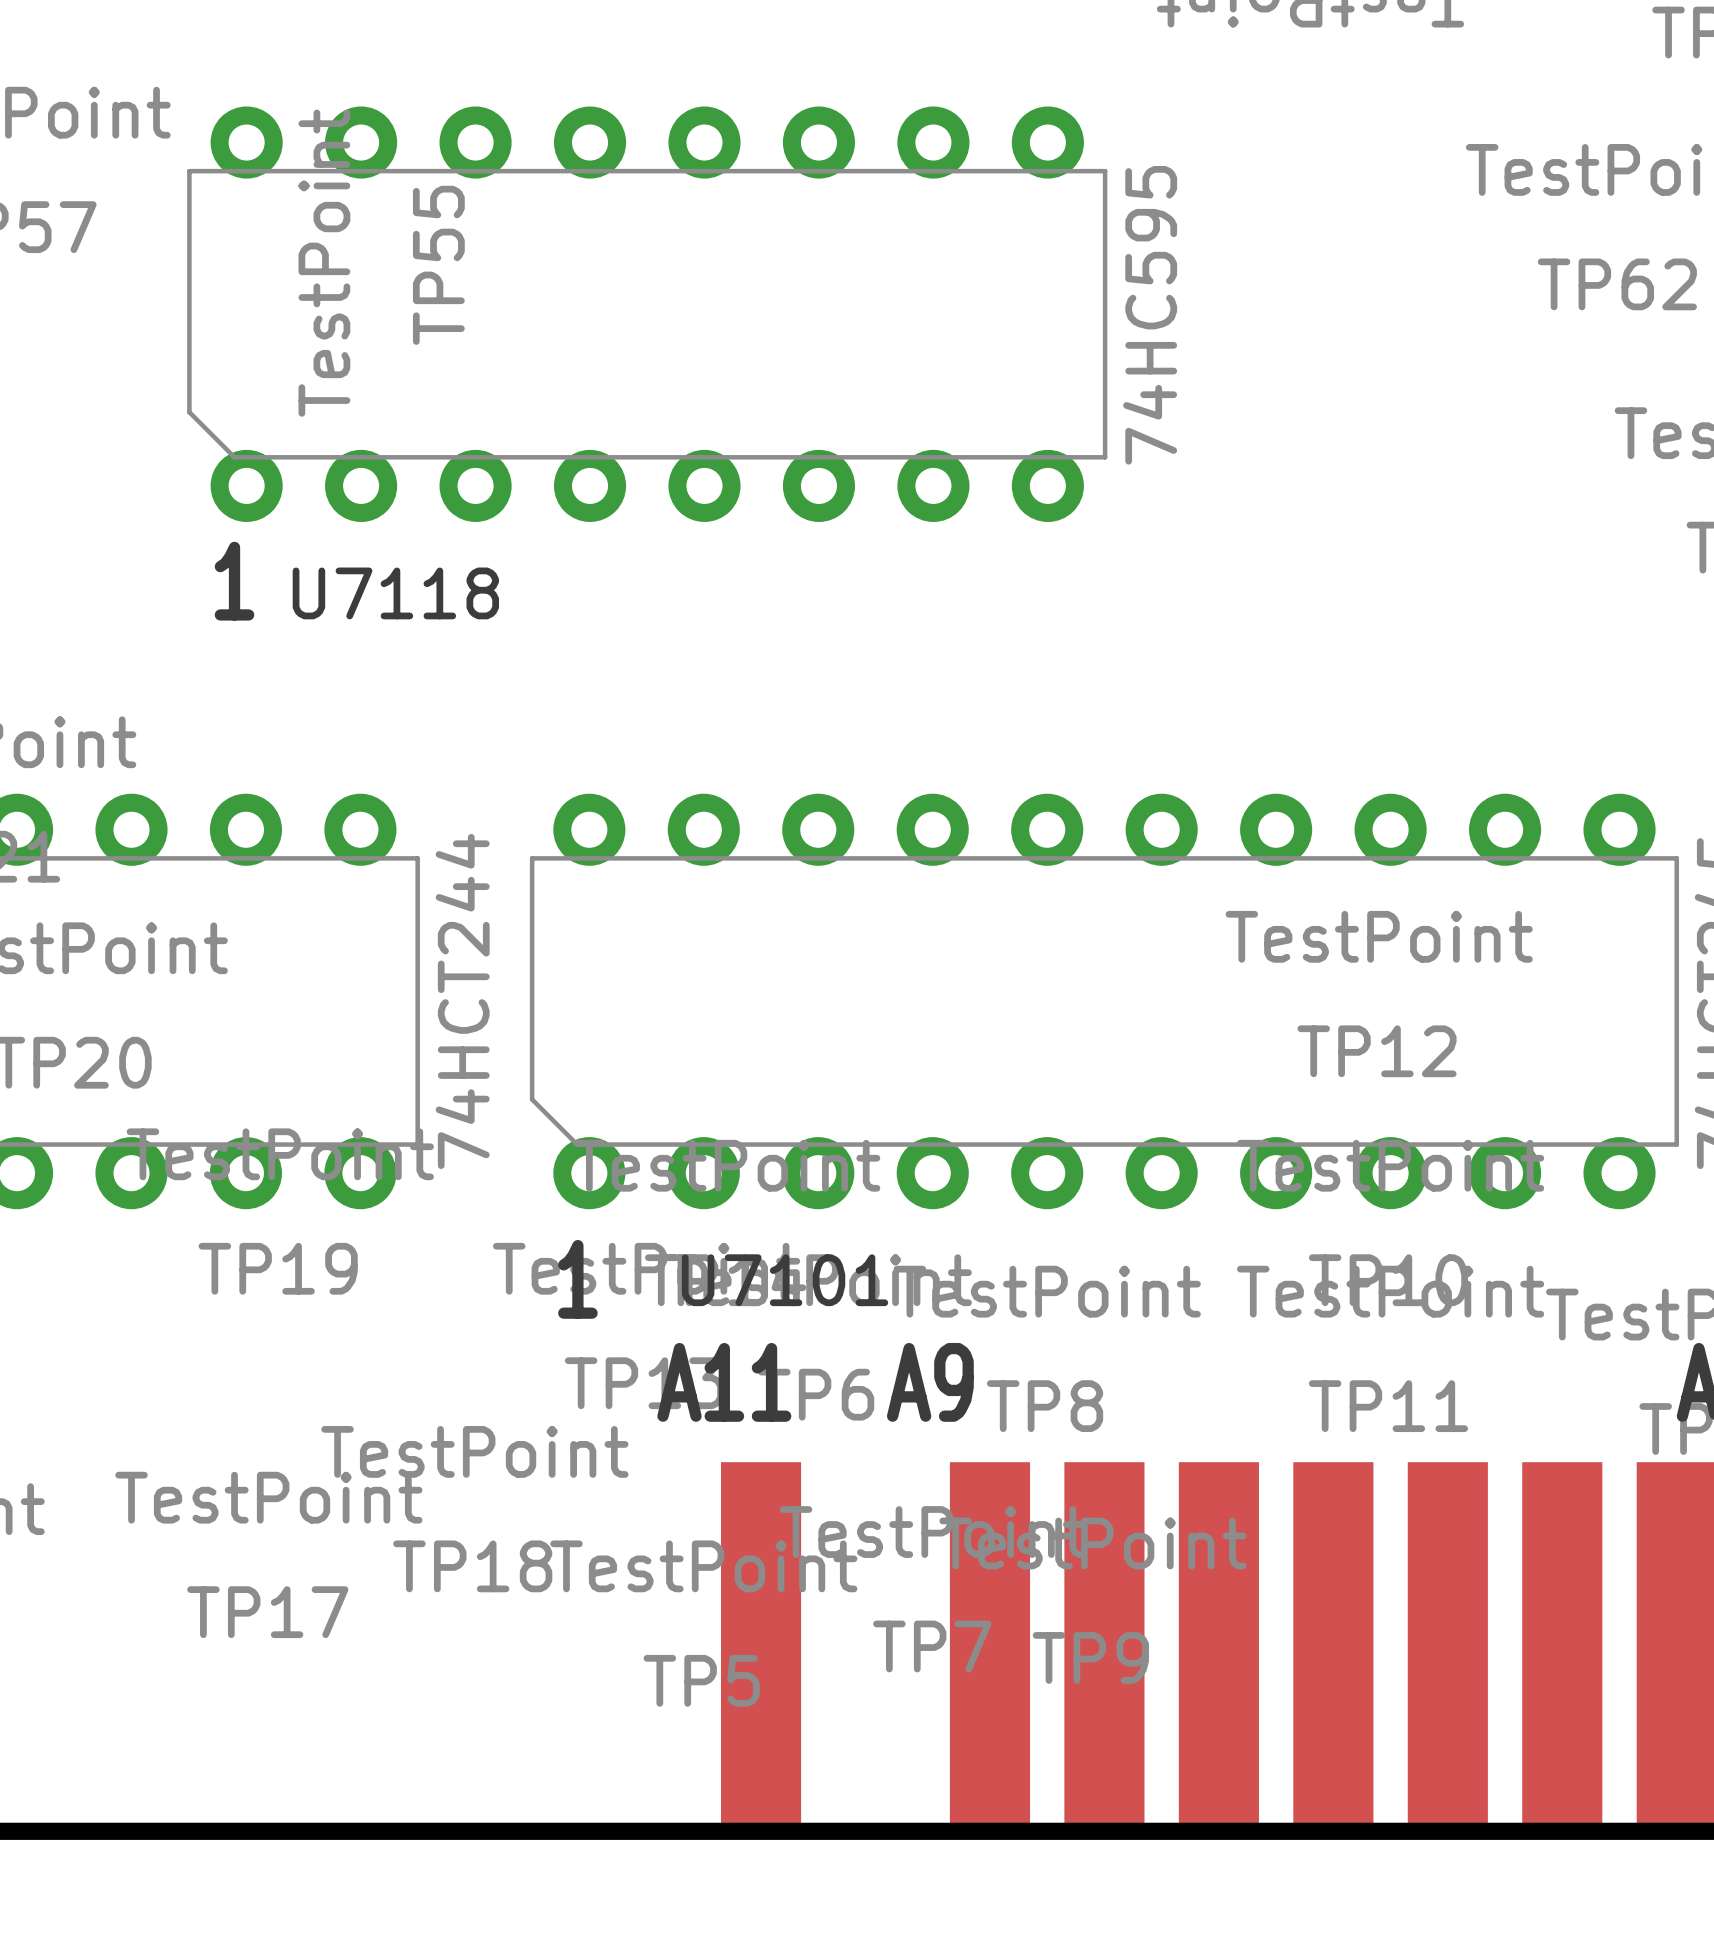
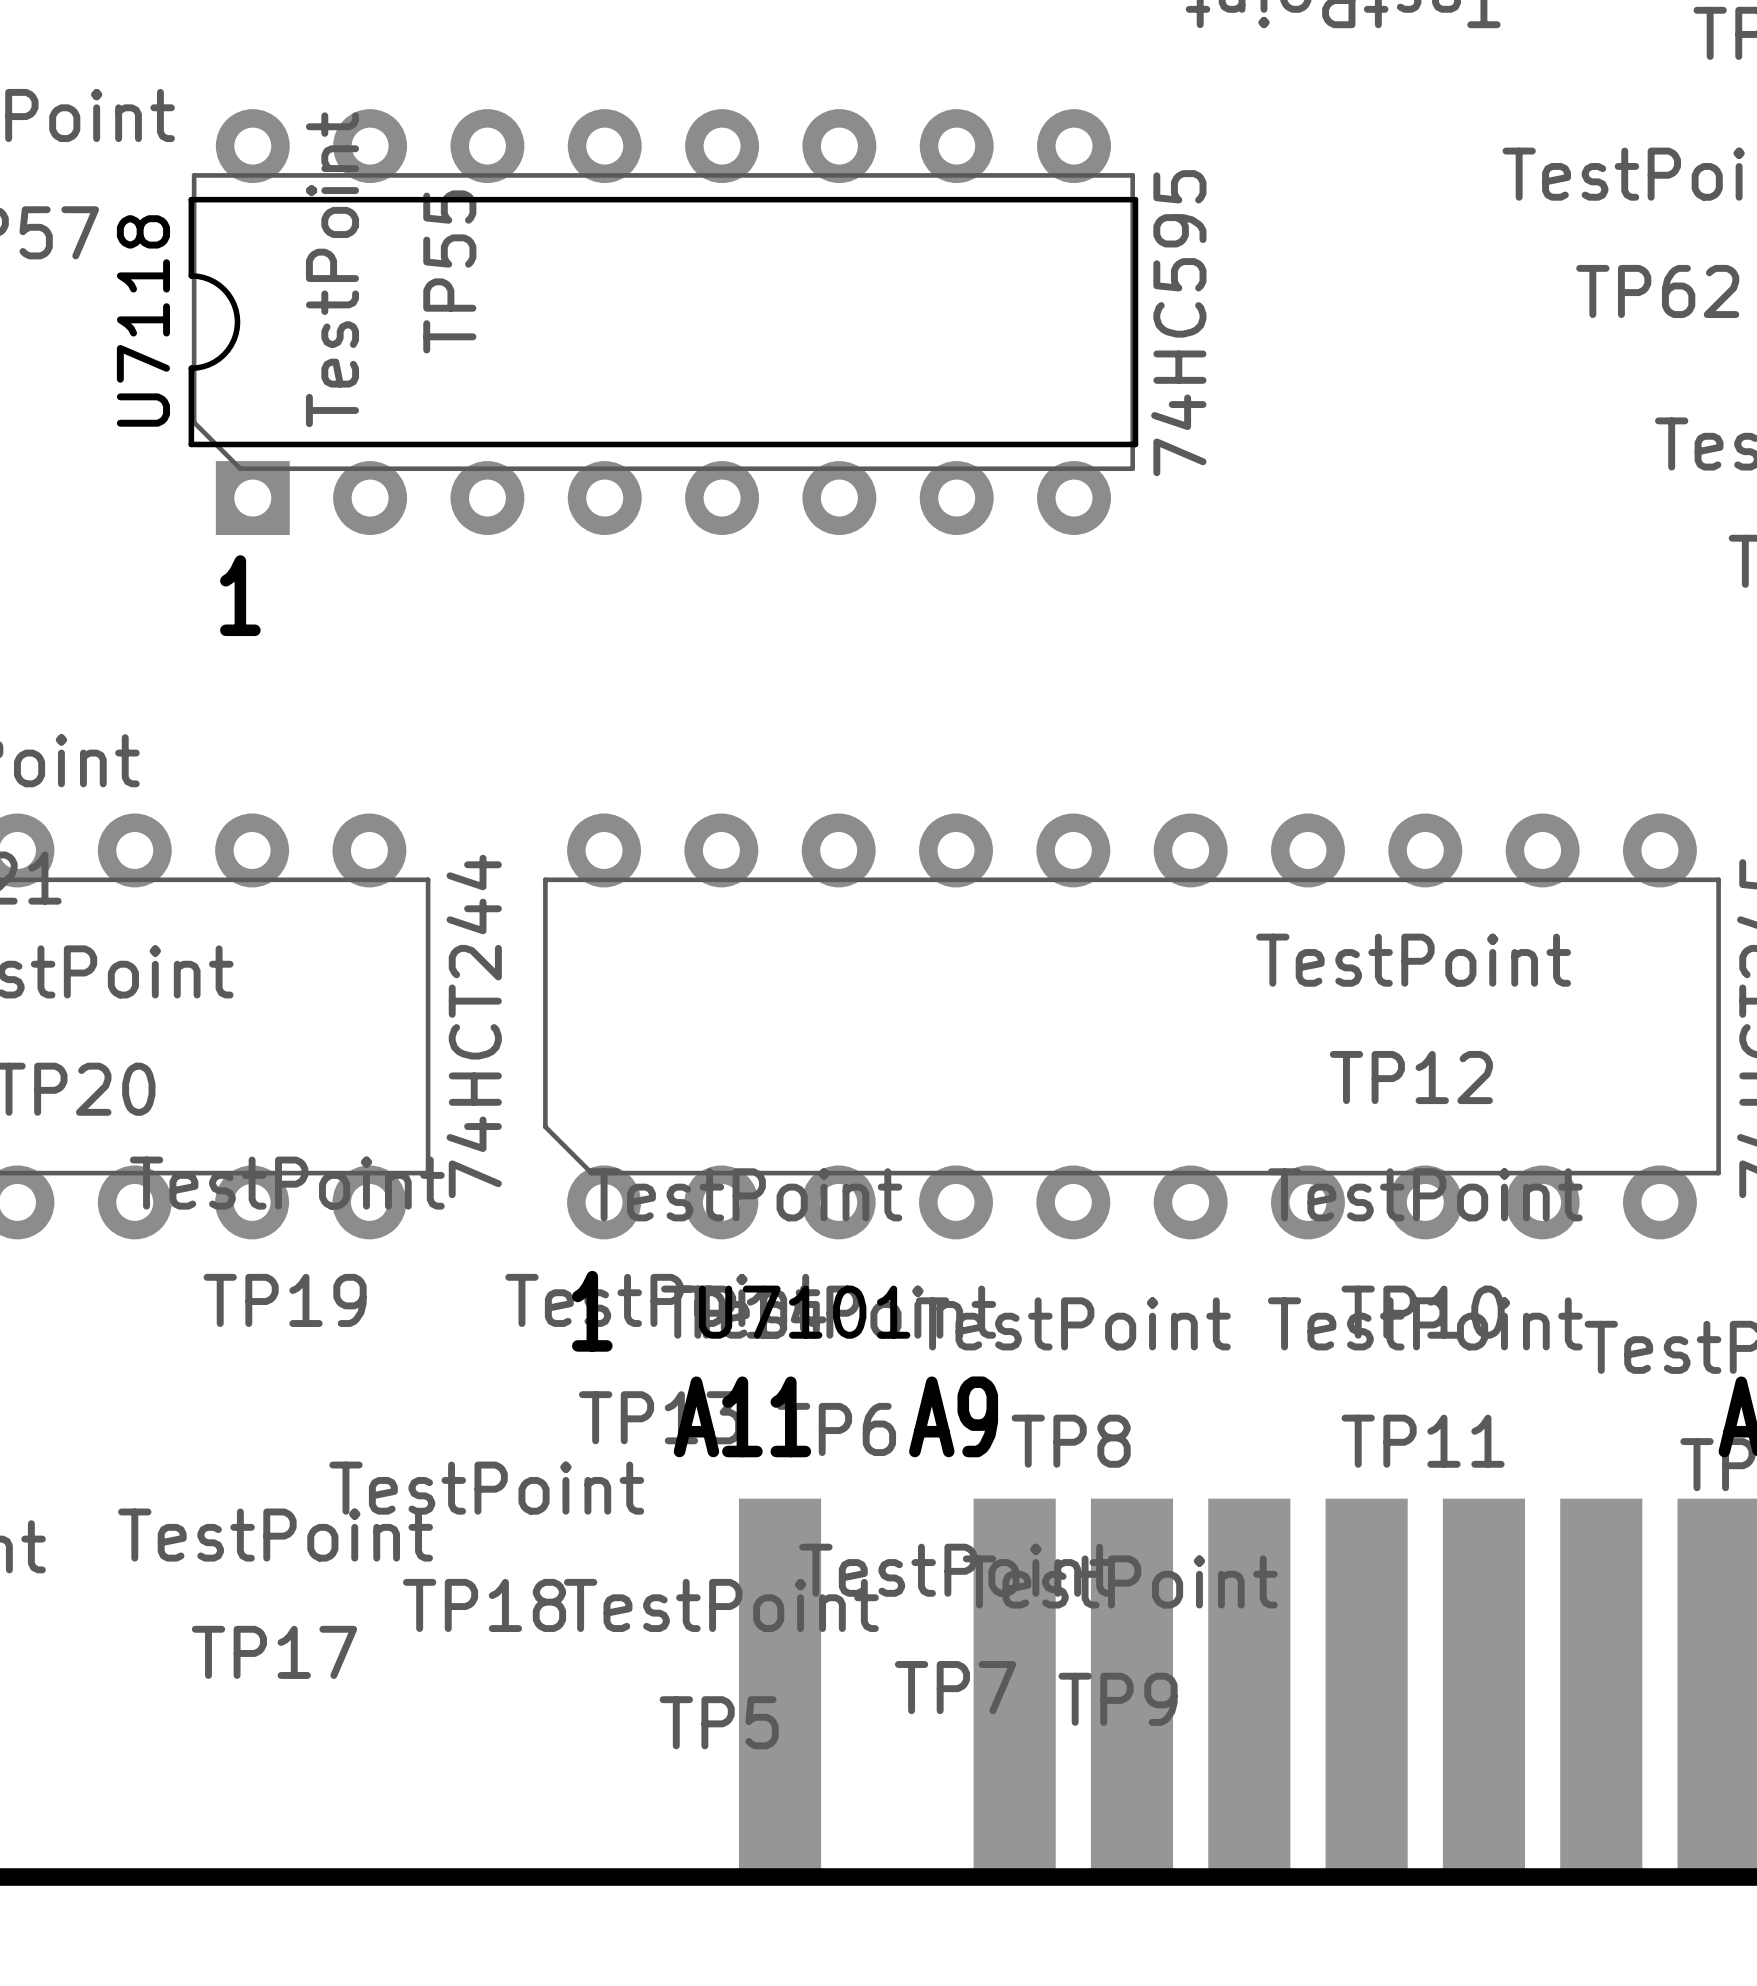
U7118 footprint: [187, 106, 1108, 522] -> [188, 109, 1139, 536]
U7118 name position: U7118 (395, 593) -> U7118 (143, 320)

